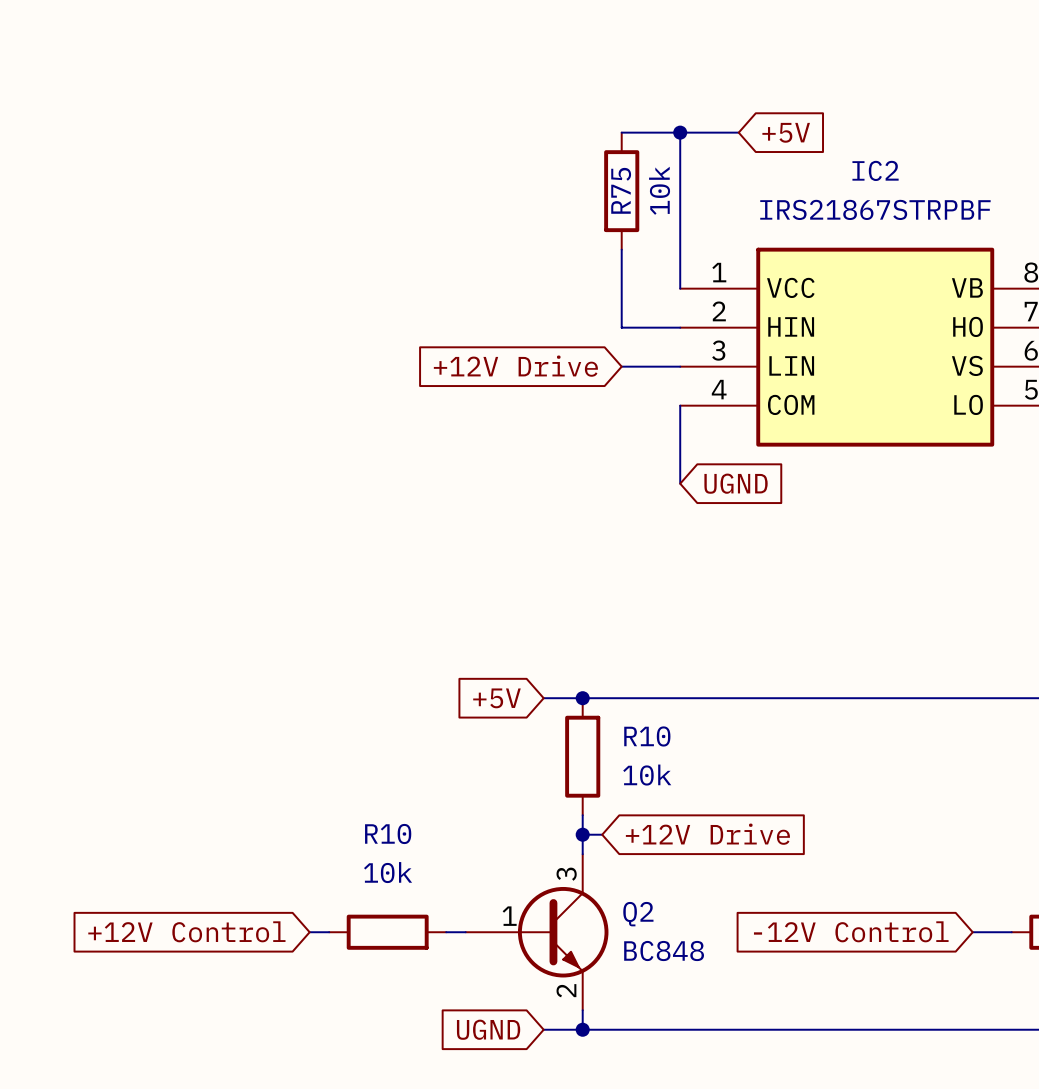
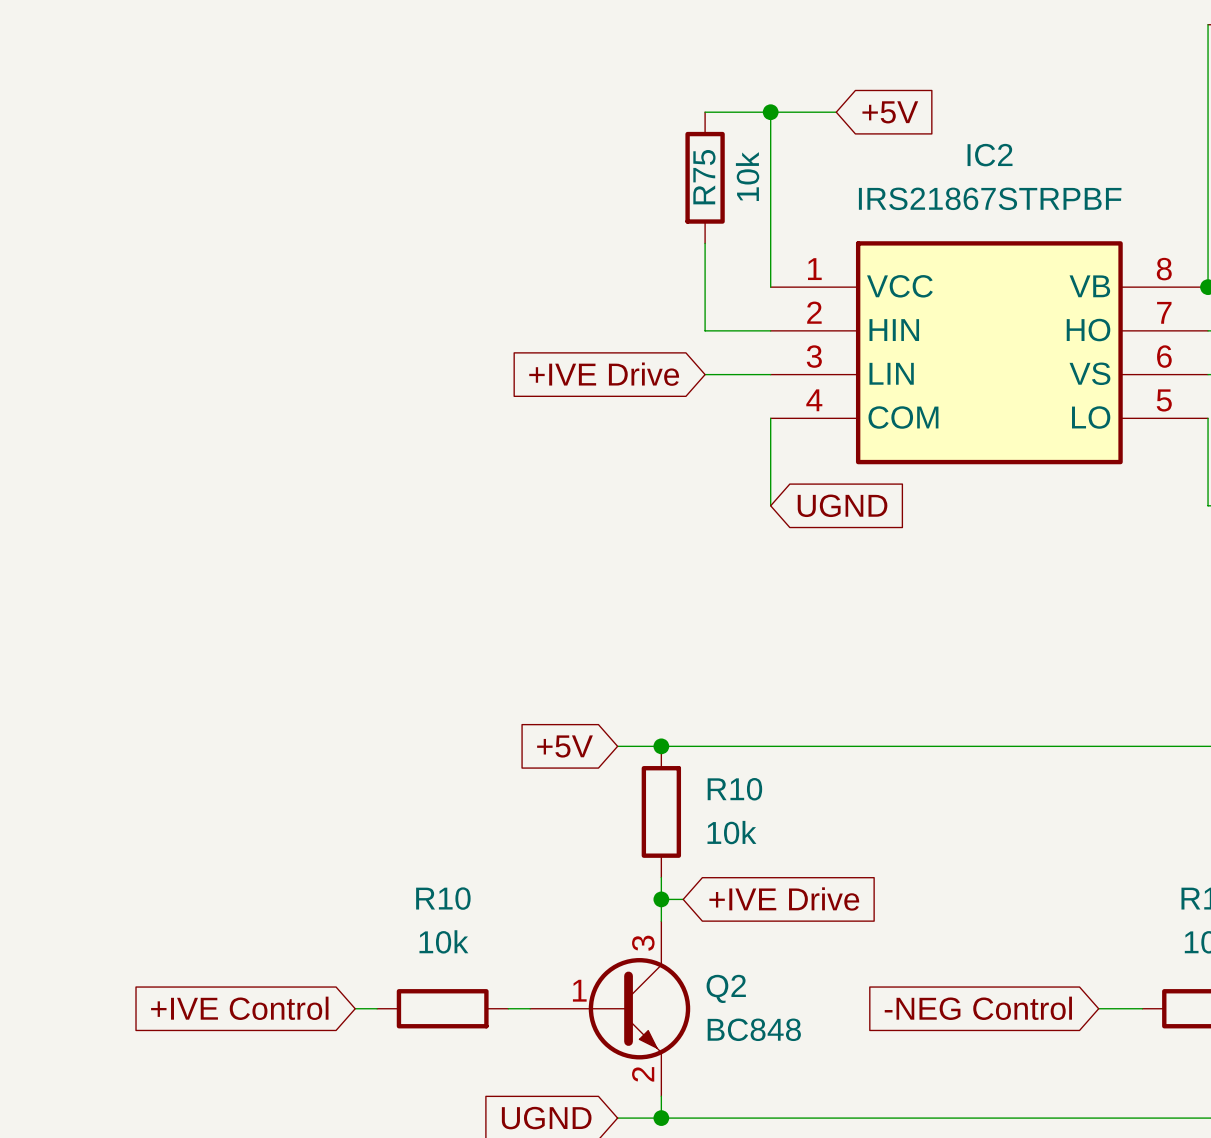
global label: +12V Drive (515, 366) -> +IVE Drive (604, 374)
global label: +12V Drive (707, 834) -> +IVE Drive (784, 898)
global label: +12V Control (186, 931) -> +IVE Control (239, 1008)
global label: -12V Control (851, 931) -> -NEG Control (978, 1008)

